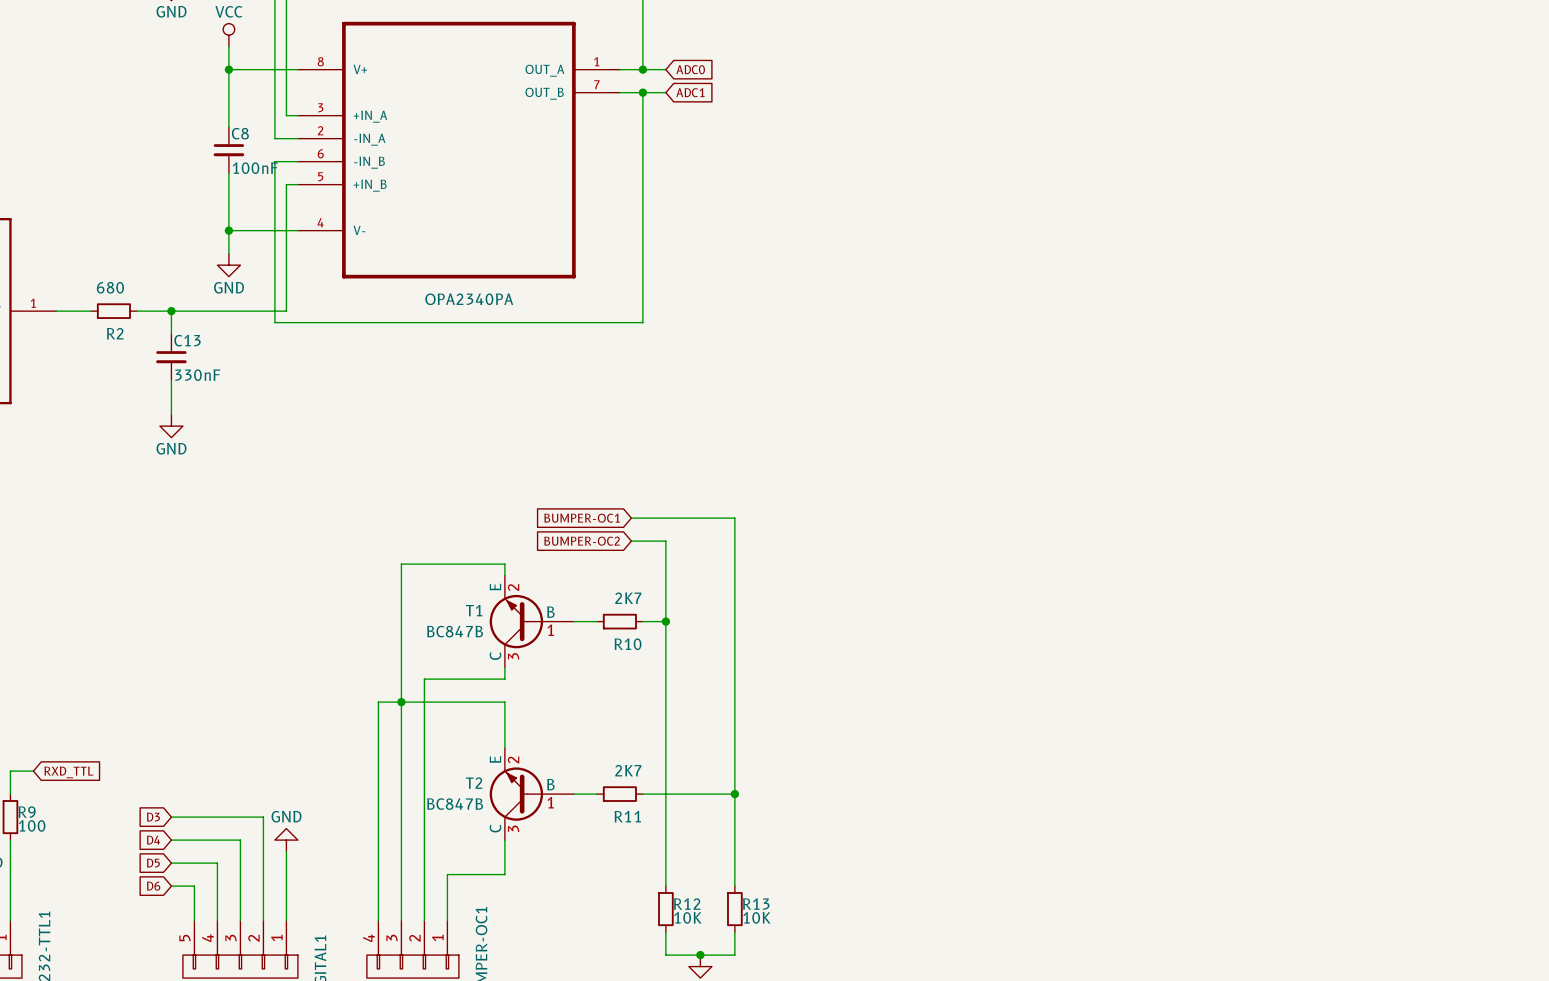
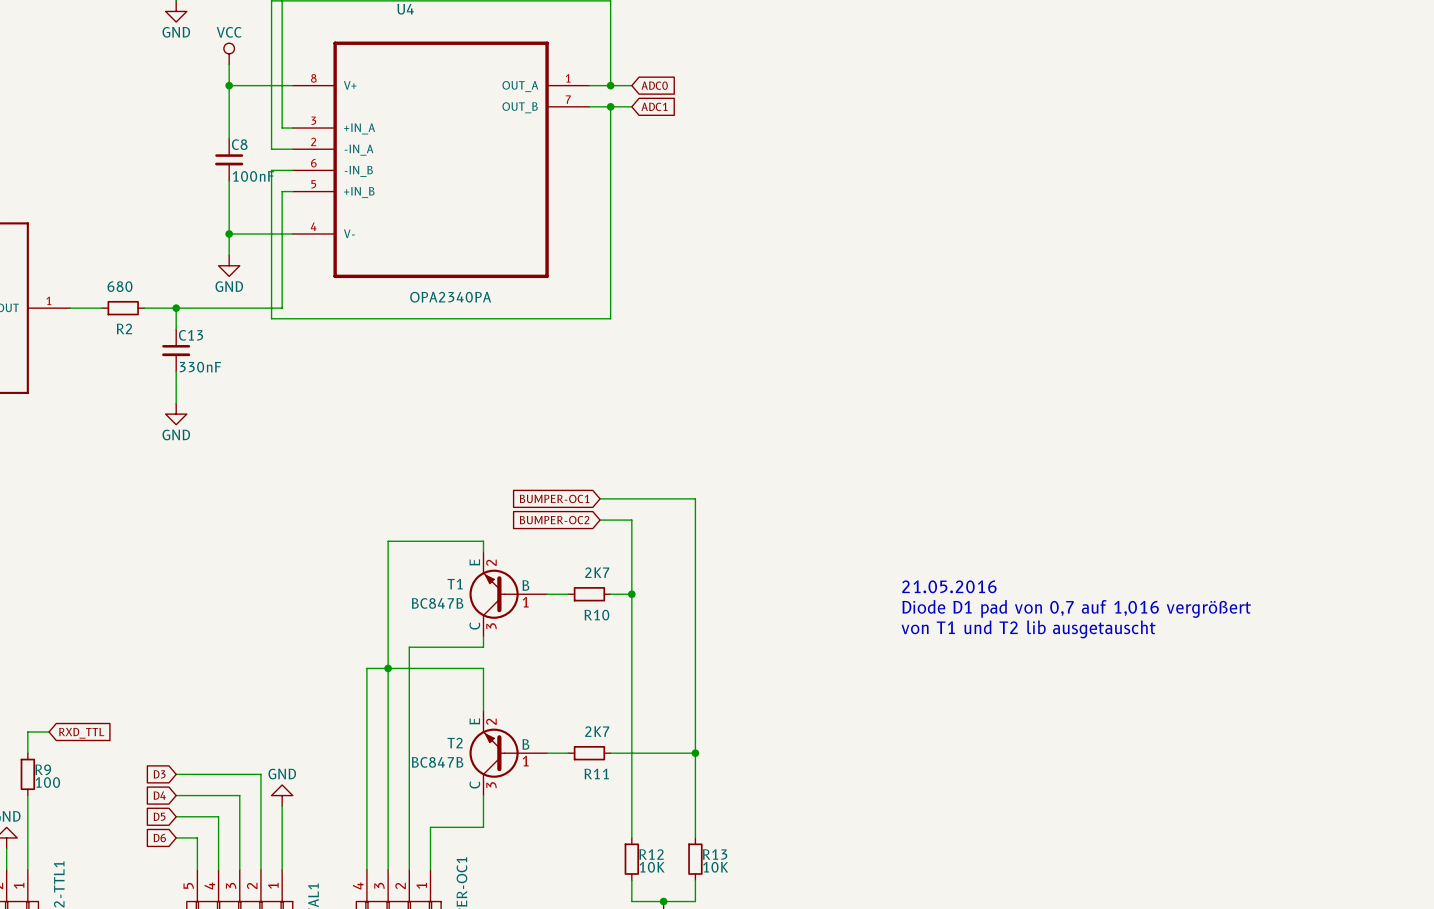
text: none -> 21.05.2016 (949, 586)
text: none -> Diode D1 pad von 0,7 auf 1,016 vergrößert (1076, 608)
text: none -> von T1 und T2 lib ausgetauscht (1028, 629)

